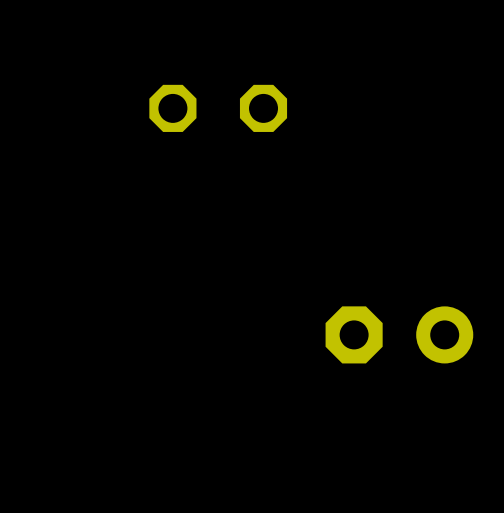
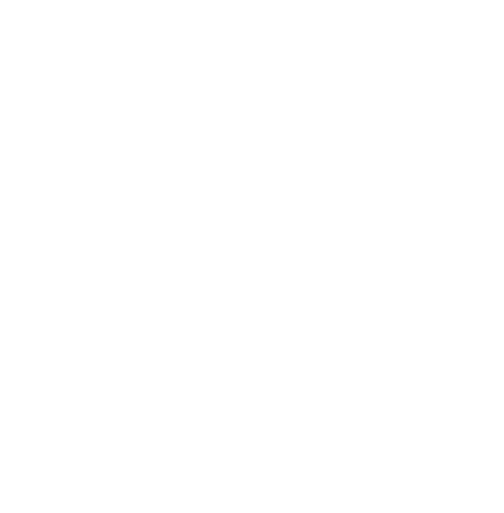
part: (218, 108) -> none
part: (399, 334) -> none

